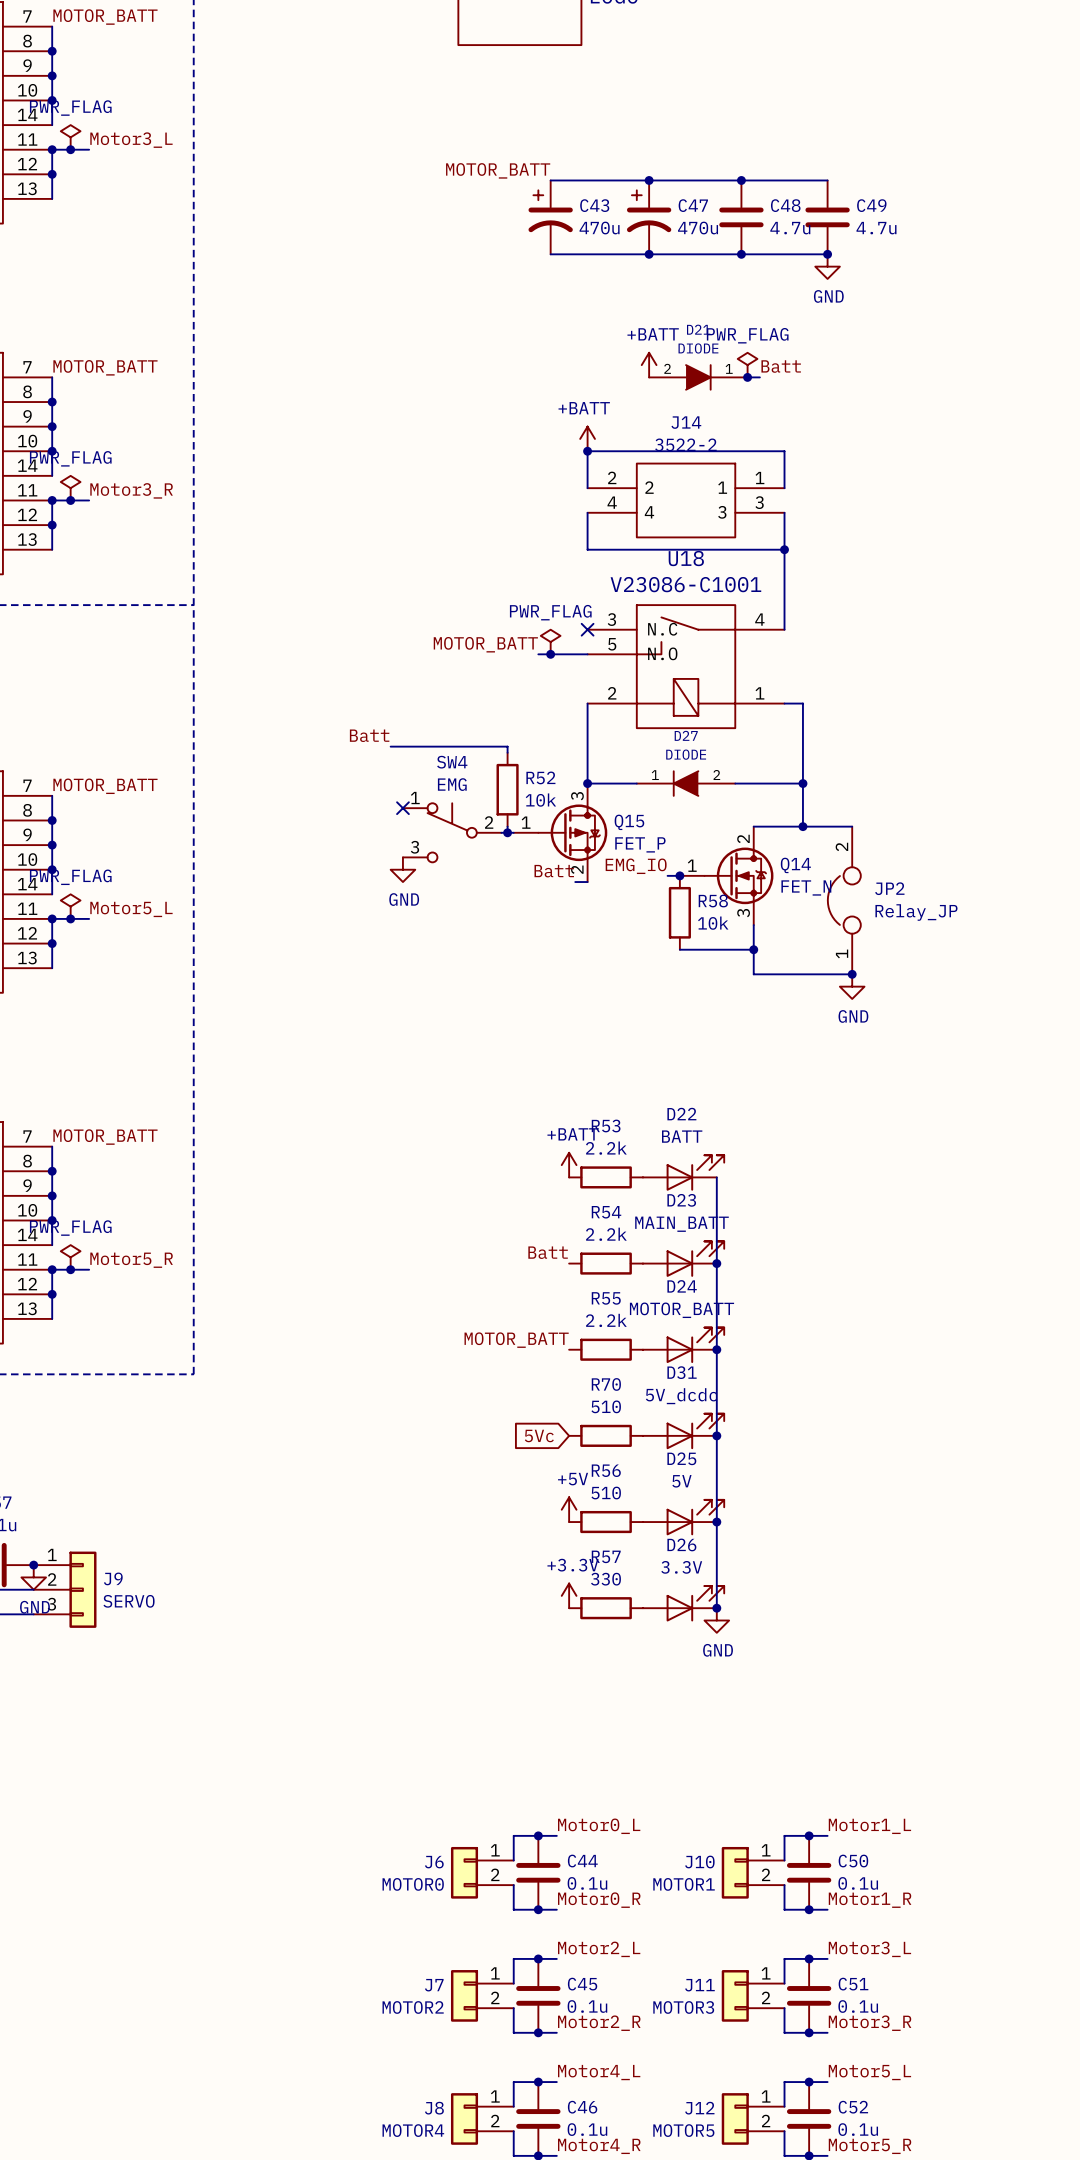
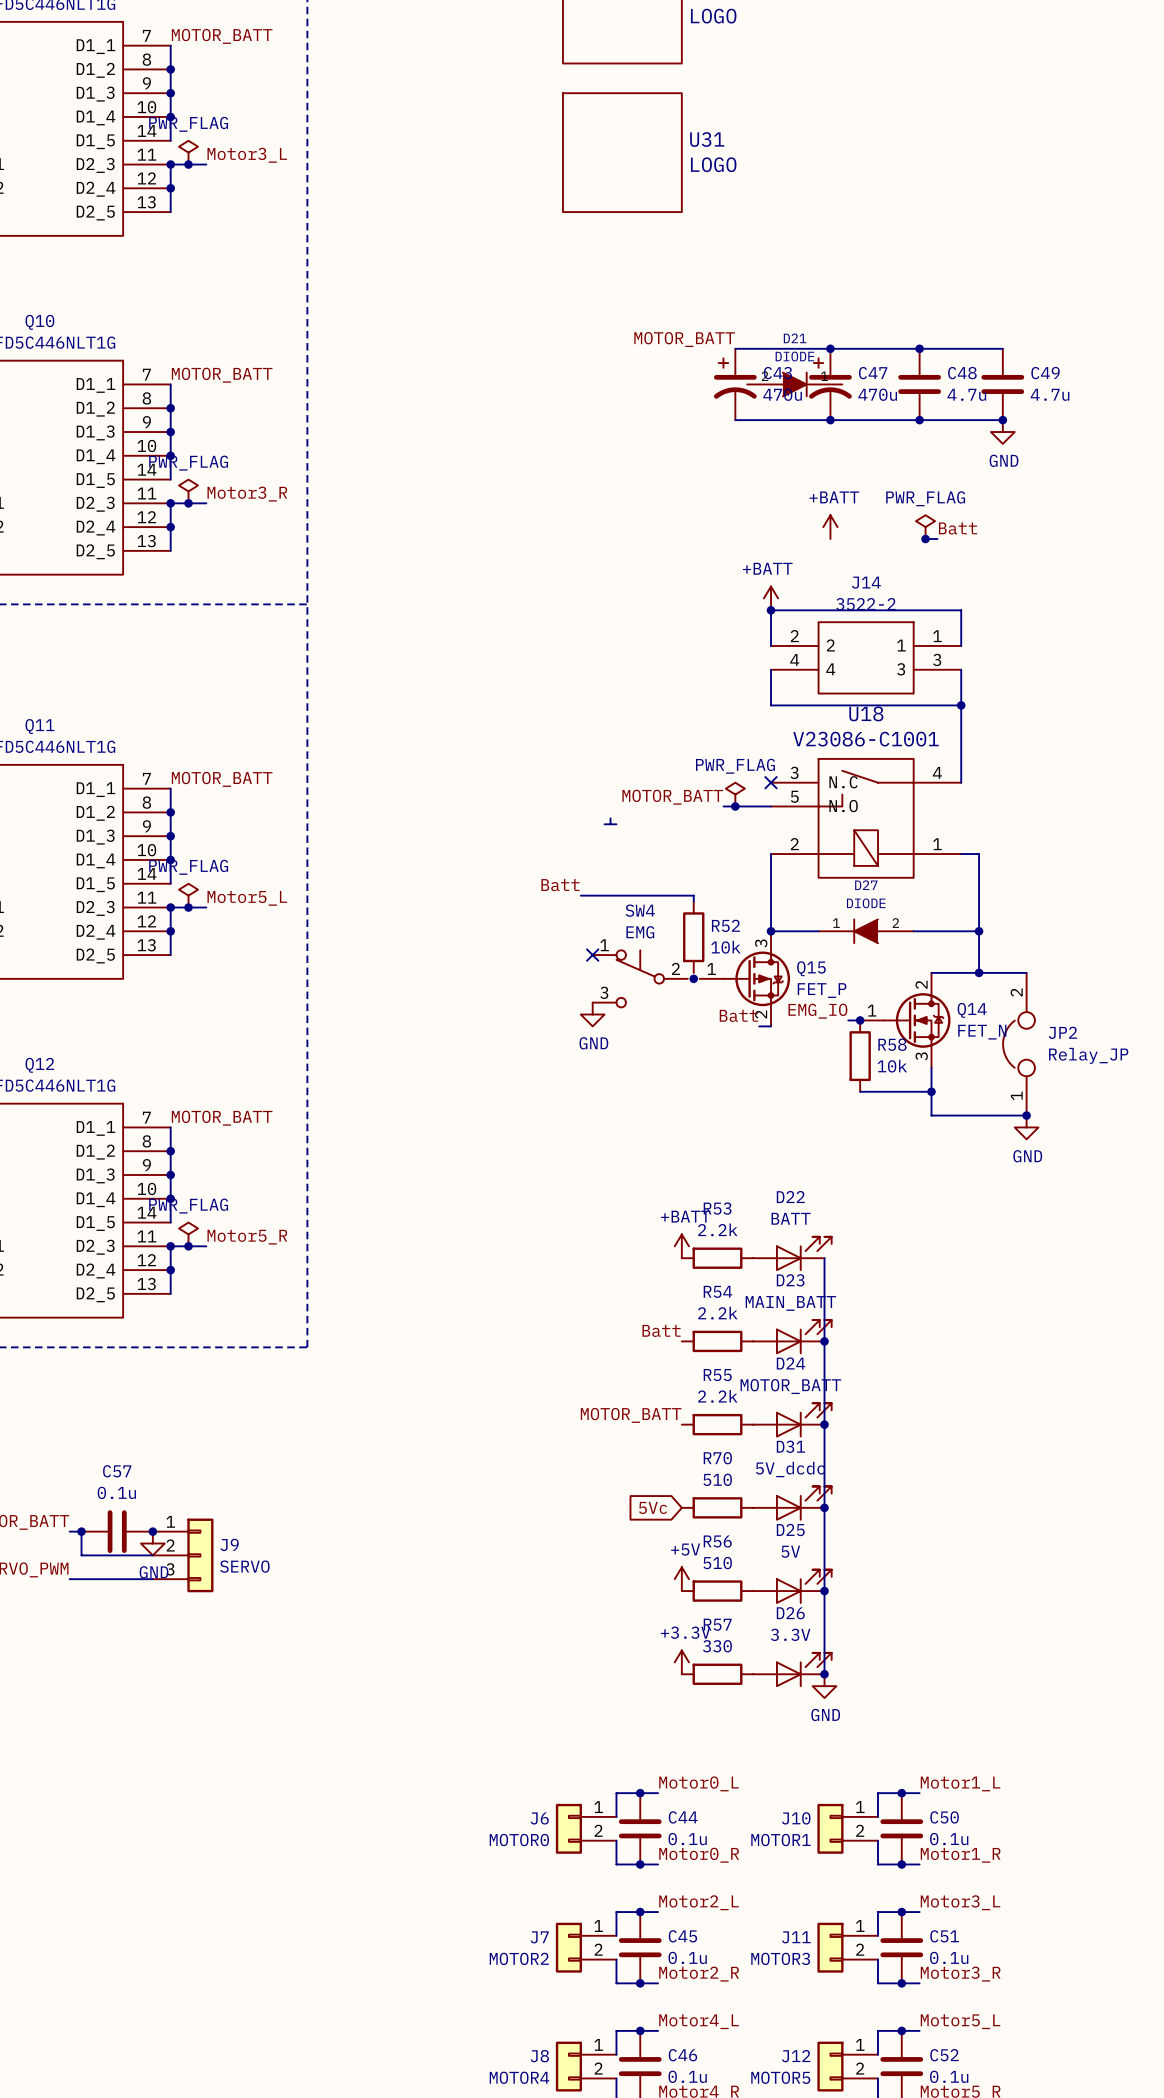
U31: none -> LOGO (622, 152)
label: MOTOR_BATT (498, 170) -> none
wire: (550, 180) (827, 180) -> (735, 348) (1002, 348)
junction: (649, 180) -> none
junction: (741, 180) -> none
C43 position: (550, 217) -> (735, 384)
C47 position: (649, 217) -> (830, 384)
C48 position: (741, 217) -> (919, 384)
C49 position: (827, 217) -> (1002, 384)
wire: (550, 254) (827, 254) -> (735, 420) (1002, 420)
junction: (649, 254) -> none
junction: (741, 254) -> none
junction: (827, 254) -> none
power symbol position: GND (827, 266) -> GND (1002, 432)
label: none -> MOTOR_BATT (684, 339)
junction: none -> (830, 348)
junction: none -> (919, 348)
power symbol: +BATT (649, 365) -> none
power symbol: PWR_FLAG (747, 365) -> none
label position: Batt (781, 366) -> Batt (957, 528)
wire: (747, 377) (759, 377) -> (925, 539) (937, 539)
junction: (747, 377) -> none
junction: none -> (830, 420)
junction: none -> (919, 420)
junction: none -> (1002, 420)
power symbol: +BATT (587, 438) -> none
junction: (587, 451) -> none
wire: (587, 488) (587, 451) (784, 451) (784, 488) -> (771, 645) (771, 610) (961, 610) (961, 645)
J14 position: (686, 500) -> (866, 657)
wire: (587, 512) (587, 549) (784, 549) -> (771, 669) (771, 705) (961, 705)
wire: (784, 512) (784, 629) -> (961, 669) (961, 782)
power symbol: none -> +BATT (830, 527)
power symbol: none -> PWR_FLAG (925, 527)
junction position: (784, 549) -> (925, 539)
power symbol: none -> +BATT (771, 598)
junction: none -> (771, 610)
no-connect mark: (587, 629) -> none
power symbol: PWR_FLAG (550, 642) -> none
label: MOTOR_BATT (485, 644) -> none
wire: (538, 654) (587, 654) -> (723, 806) (771, 806)
junction: (550, 654) -> none
U18 position: (686, 666) -> (866, 818)
wire: (587, 703) (587, 783) (636, 783) -> (771, 854) (771, 931) (818, 931)
wire: (784, 703) (802, 703) (802, 826) -> (961, 854) (979, 854) (979, 972)
junction: none -> (961, 705)
label: Batt (369, 735) -> none
wire: (390, 746) (507, 746) (507, 752) -> (580, 895) (693, 895) (693, 901)
junction: (587, 783) -> none
D27 position: (686, 783) -> (866, 931)
wire: (735, 783) (802, 783) -> (913, 931) (979, 931)
junction: (802, 783) -> none
R52 position: (507, 789) -> (693, 937)
no-connect mark: none -> (771, 782)
power symbol: none -> PWR_FLAG (735, 794)
label: none -> MOTOR_BATT (672, 797)
no-connect mark: (402, 808) -> none
junction: none -> (735, 806)
wire: (753, 826) (852, 826) -> (931, 972) (1026, 972)
junction: (802, 826) -> none
SW4 position: (452, 832) -> (640, 978)
junction: (507, 832) -> none
Q15 position: (560, 832) -> (744, 978)
label position: EMG_IO (636, 866) -> EMG_IO (817, 1011)
power symbol position: GND (402, 869) -> GND (592, 1014)
label: Batt (554, 871) -> none
wire: (667, 875) (679, 875) -> (848, 1020) (860, 1020)
junction: (679, 875) -> none
Q14 position: (726, 875) -> (905, 1020)
wire: (575, 882) (587, 882) -> (759, 1026) (771, 1026)
label: none -> Batt (560, 885)
JP2 position: (844, 900) -> (1018, 1044)
R58 position: (679, 912) -> (860, 1056)
wire: (753, 925) (753, 974) (852, 974) -> (931, 1068) (931, 1115) (1026, 1115)
junction: none -> (771, 931)
junction: none -> (979, 931)
wire: (679, 949) (753, 949) -> (860, 1091) (931, 1091)
junction: (753, 949) -> none
no-connect mark: none -> (592, 955)
junction: (852, 974) -> none
power symbol position: GND (852, 986) -> GND (1026, 1127)
junction: none -> (979, 972)
junction: none -> (693, 978)
label: none -> Batt (738, 1015)
junction: none -> (860, 1020)
junction: none -> (931, 1091)
junction: none -> (1026, 1115)
power symbol position: +BATT (569, 1165) -> +BATT (681, 1246)
D22 position: (683, 1172) -> (792, 1253)
R53 position: (606, 1177) -> (717, 1258)
wire: (716, 1177) (716, 1608) -> (824, 1258) (824, 1674)
label position: Batt (548, 1252) -> Batt (661, 1330)
D23 position: (683, 1259) -> (792, 1337)
R54 position: (606, 1263) -> (717, 1341)
junction: (716, 1263) -> none
label position: MOTOR_BATT (516, 1340) -> MOTOR_BATT (631, 1415)
D24 position: (683, 1345) -> (792, 1420)
R55 position: (606, 1349) -> (717, 1424)
junction position: (716, 1349) -> (824, 1341)
D31 position: (683, 1431) -> (792, 1503)
global label position: 5Vc (539, 1435) -> 5Vc (653, 1507)
R70 position: (606, 1435) -> (717, 1507)
junction position: (716, 1435) -> (824, 1424)
power symbol position: +5V (569, 1509) -> +5V (681, 1579)
D25 position: (683, 1517) -> (792, 1586)
R56 position: (606, 1522) -> (717, 1591)
junction position: (716, 1522) -> (824, 1507)
power symbol position: +3.3V (569, 1595) -> +3.3V (681, 1662)
D26 position: (683, 1603) -> (792, 1670)
R57 position: (606, 1608) -> (717, 1674)
junction position: (716, 1608) -> (824, 1591)
power symbol position: GND (716, 1620) -> GND (824, 1686)
junction: none -> (824, 1674)

